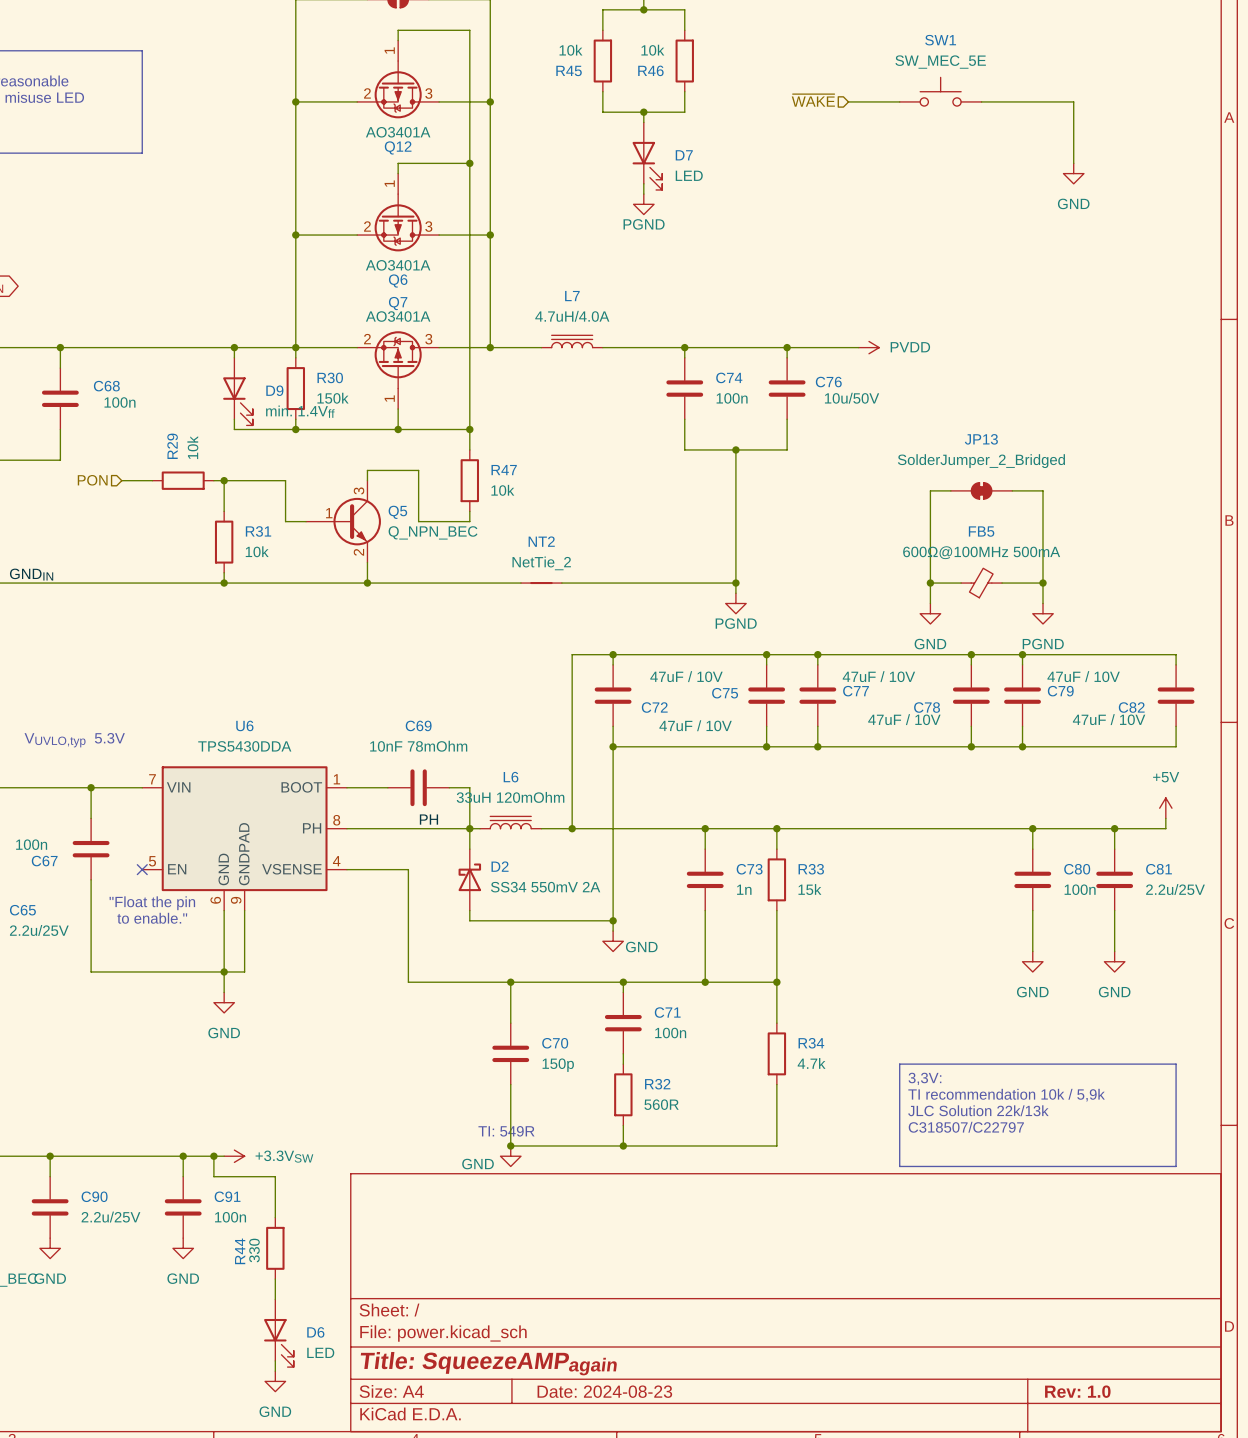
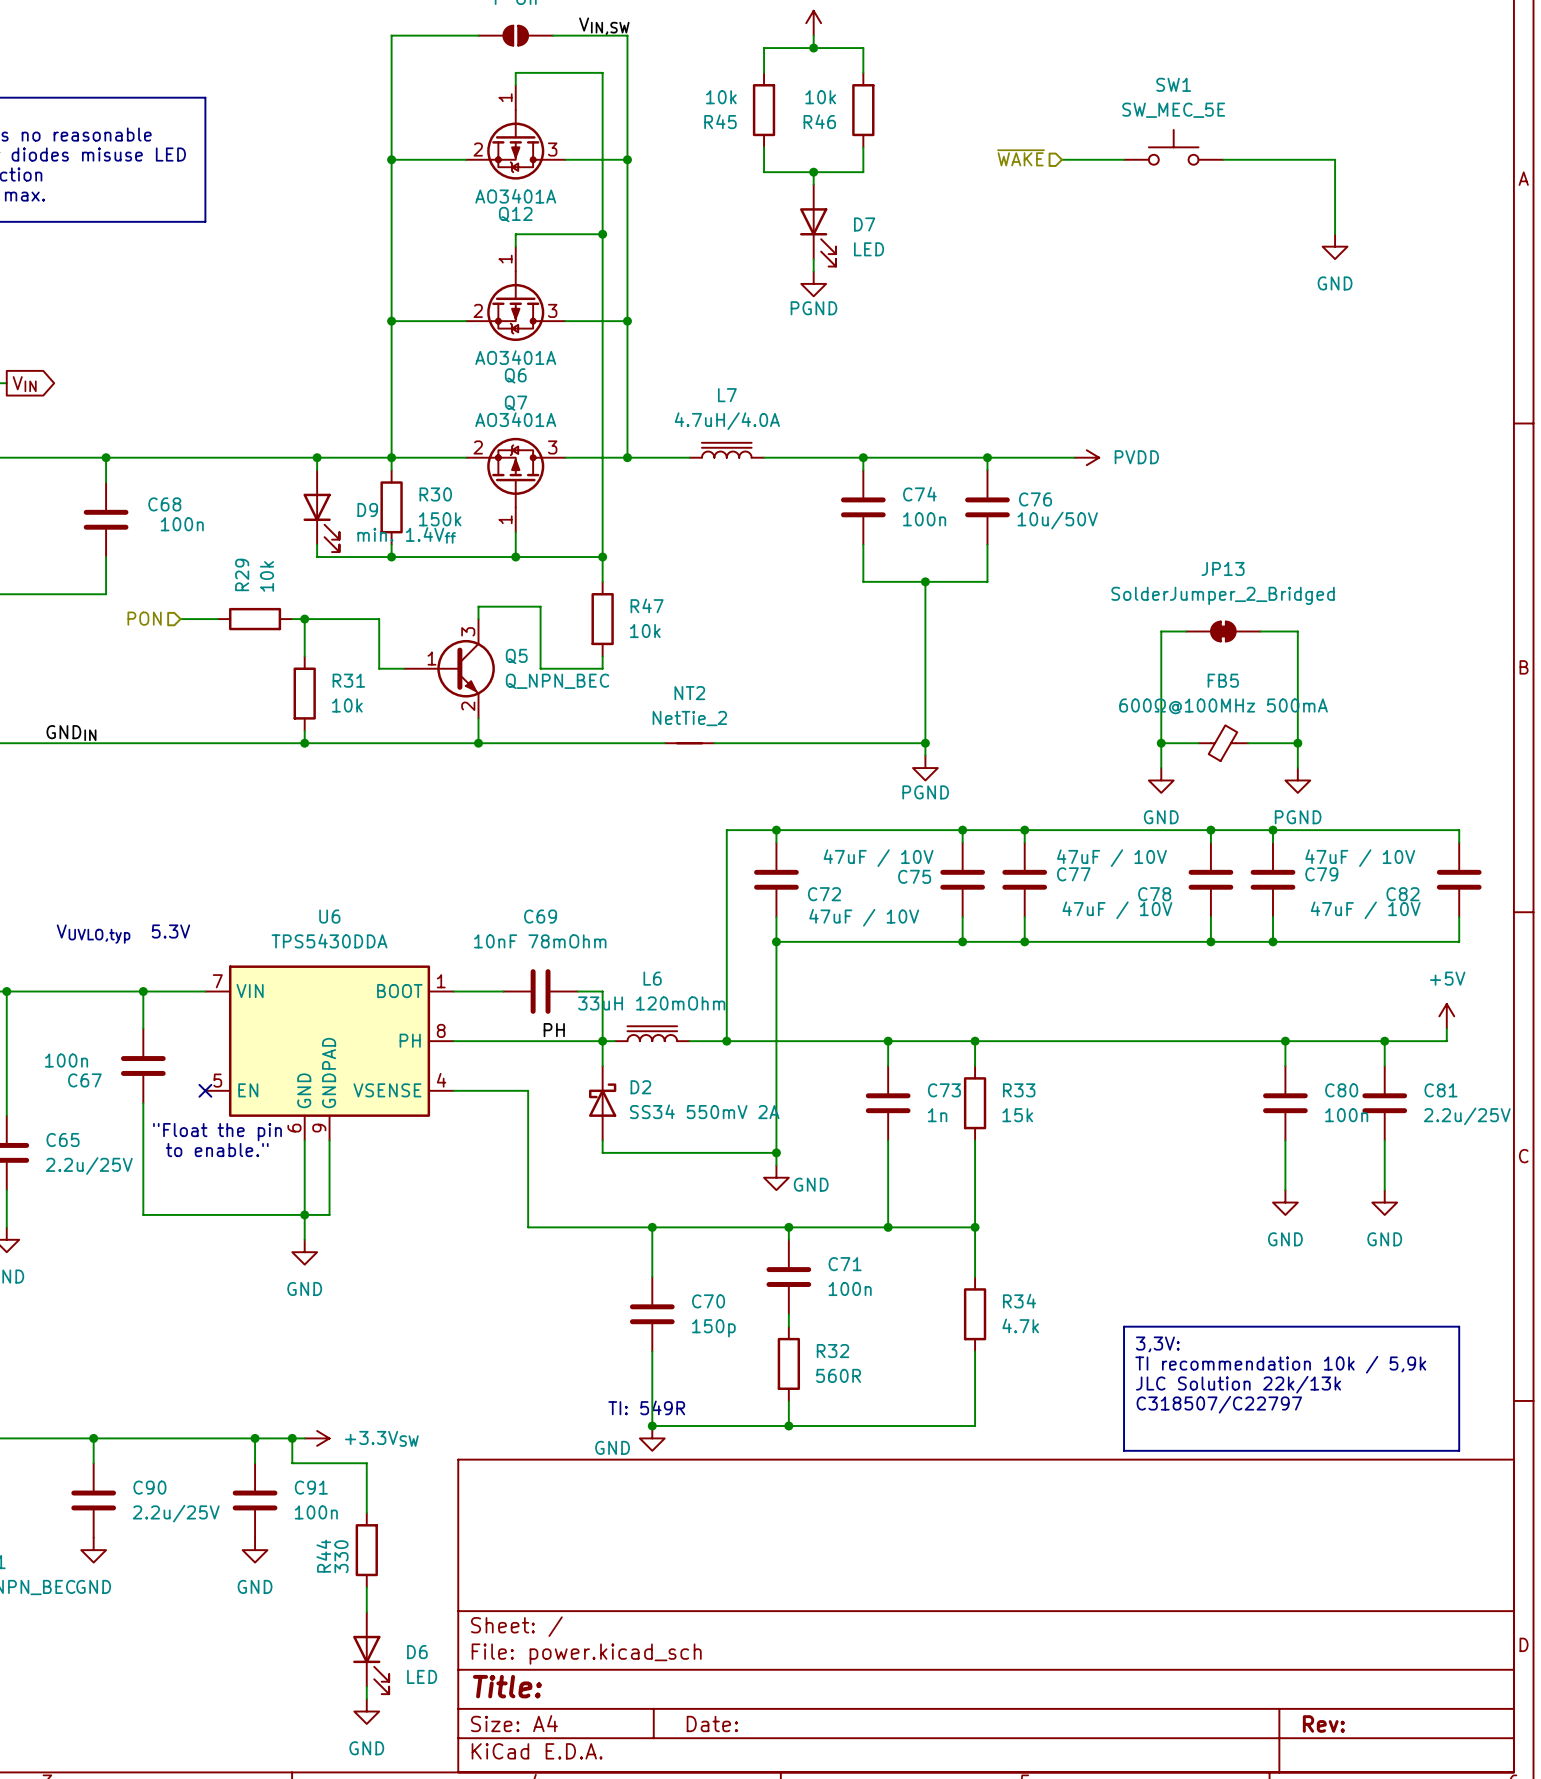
title block: Title: SqueezeAMPagain (488, 1363) -> Title: (507, 1686)
title block: Date: 2024-08-23 (604, 1391) -> Date: (712, 1723)
title block: Rev: 1.0 (1077, 1391) -> Rev: (1323, 1723)

